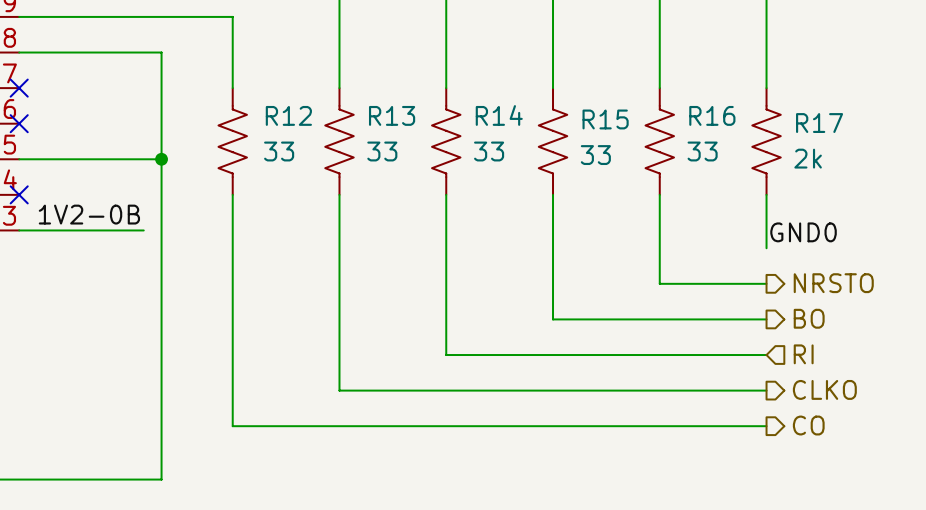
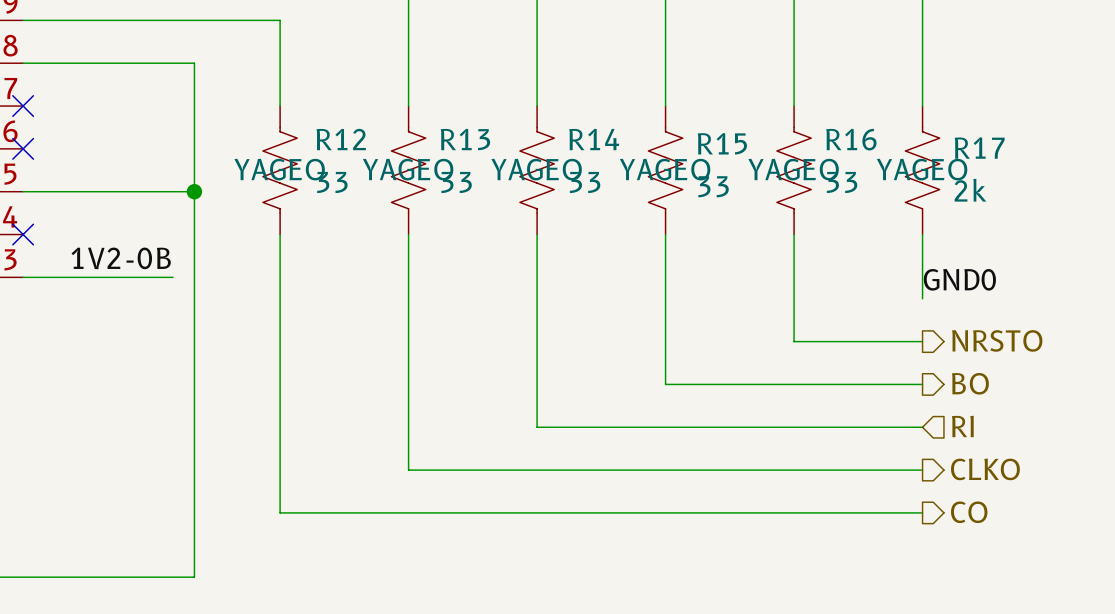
R12 text: none -> YAGEO (279, 169)
R13 text: none -> YAGEO (408, 169)
R14 text: none -> YAGEO (536, 169)
R15 text: none -> YAGEO (665, 169)
R16 text: none -> YAGEO (793, 169)
R17 text: none -> YAGEO (922, 169)

